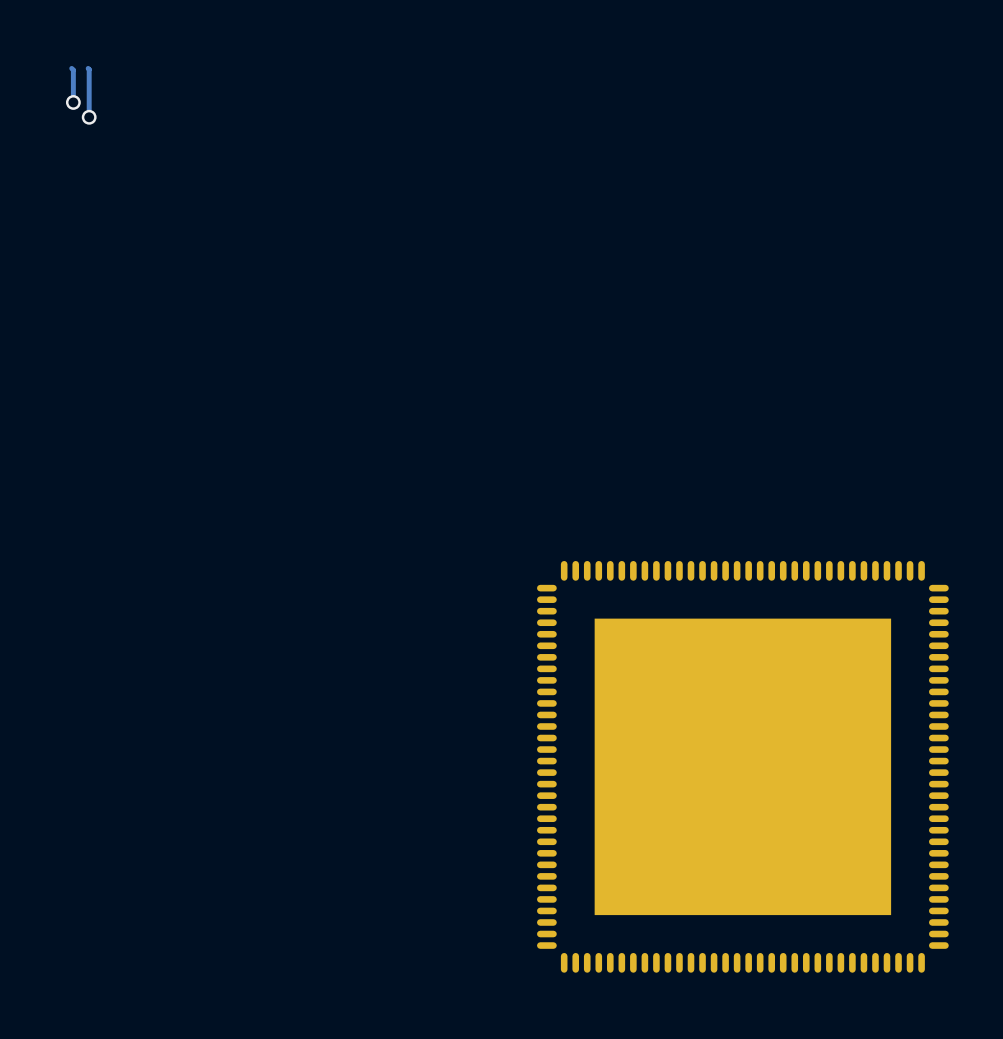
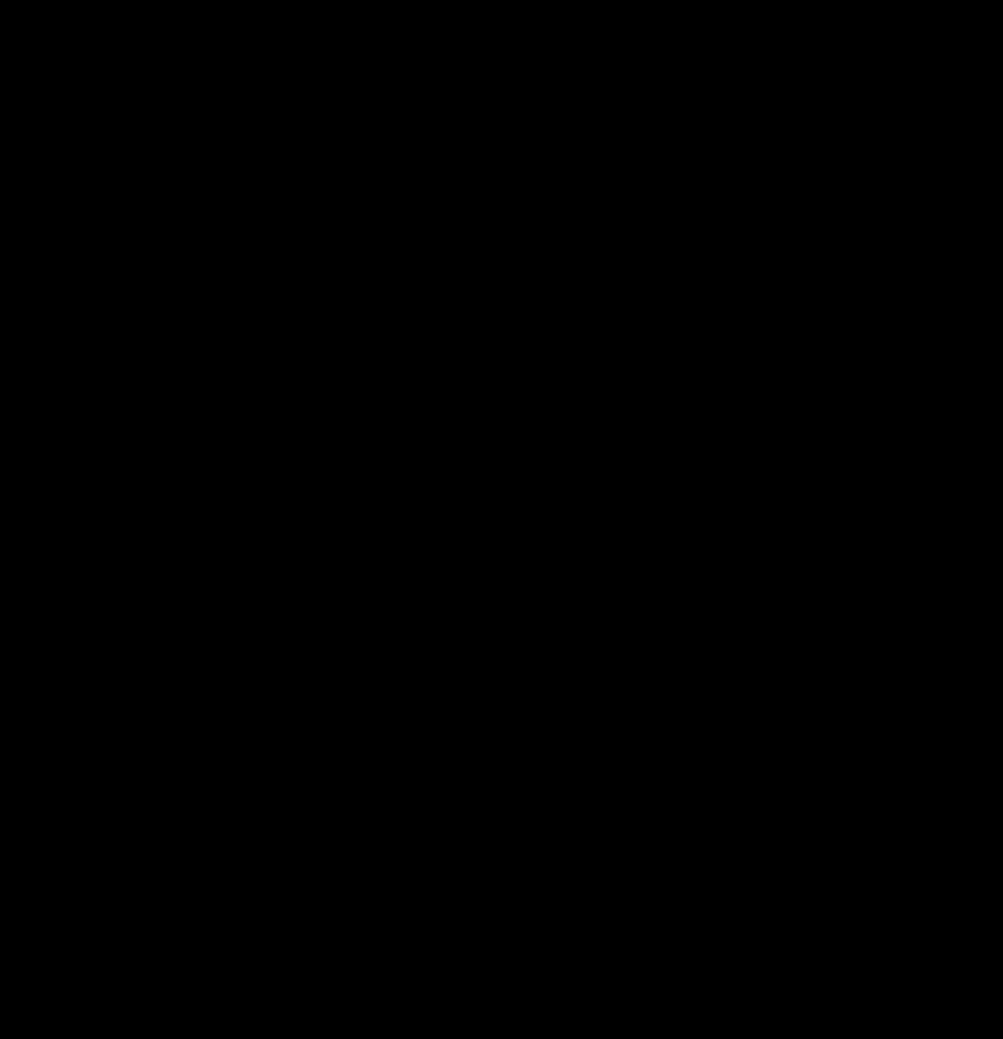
track: (71, 68) (73, 70) (73, 102) -> none
track: (88, 68) (89, 117) -> none
via: (73, 102) -> none
via: (89, 117) -> none
part: (742, 766) -> none

